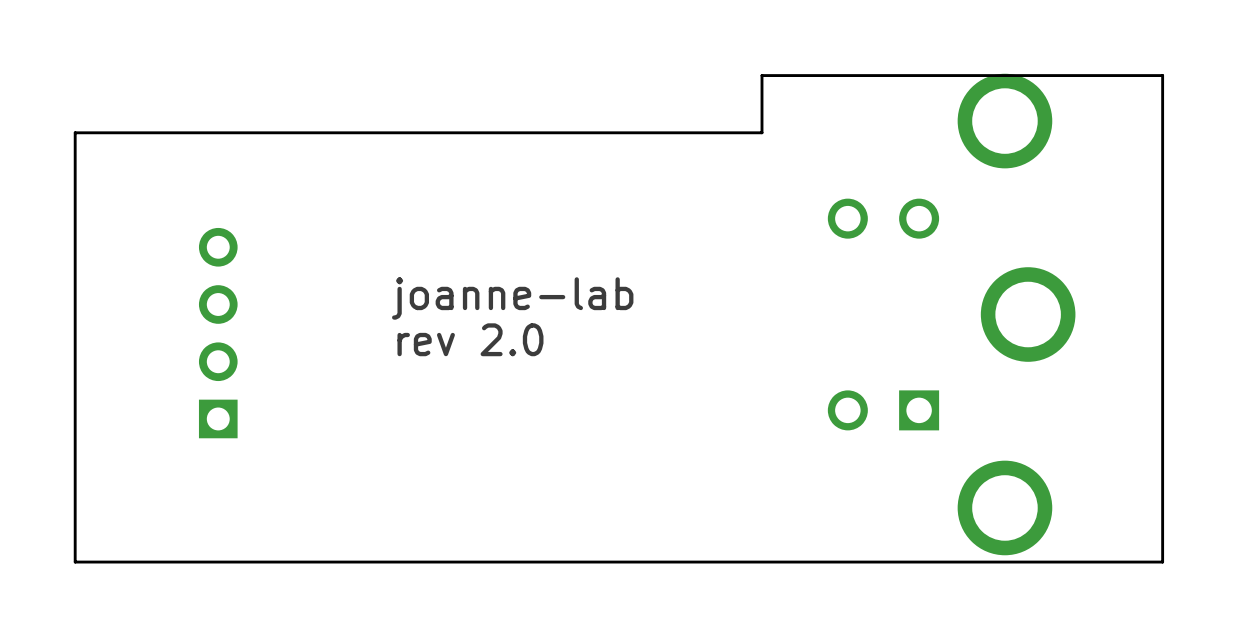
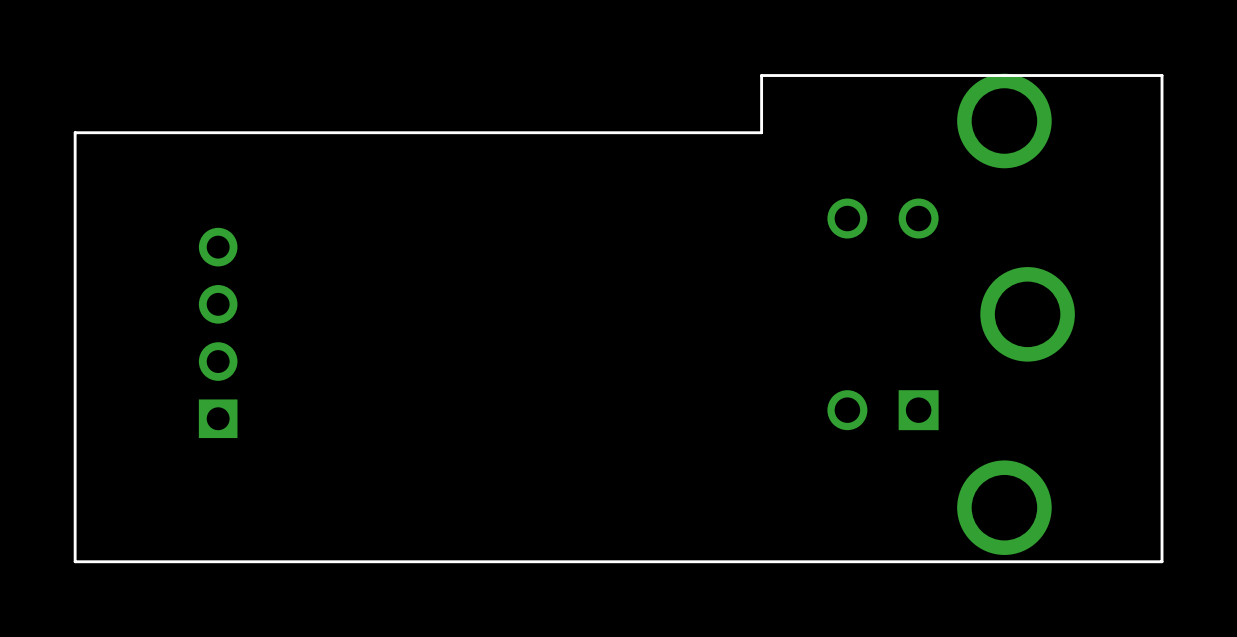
text: joanne-lab (512, 298) -> none
text: rev 2.0 (470, 339) -> none

